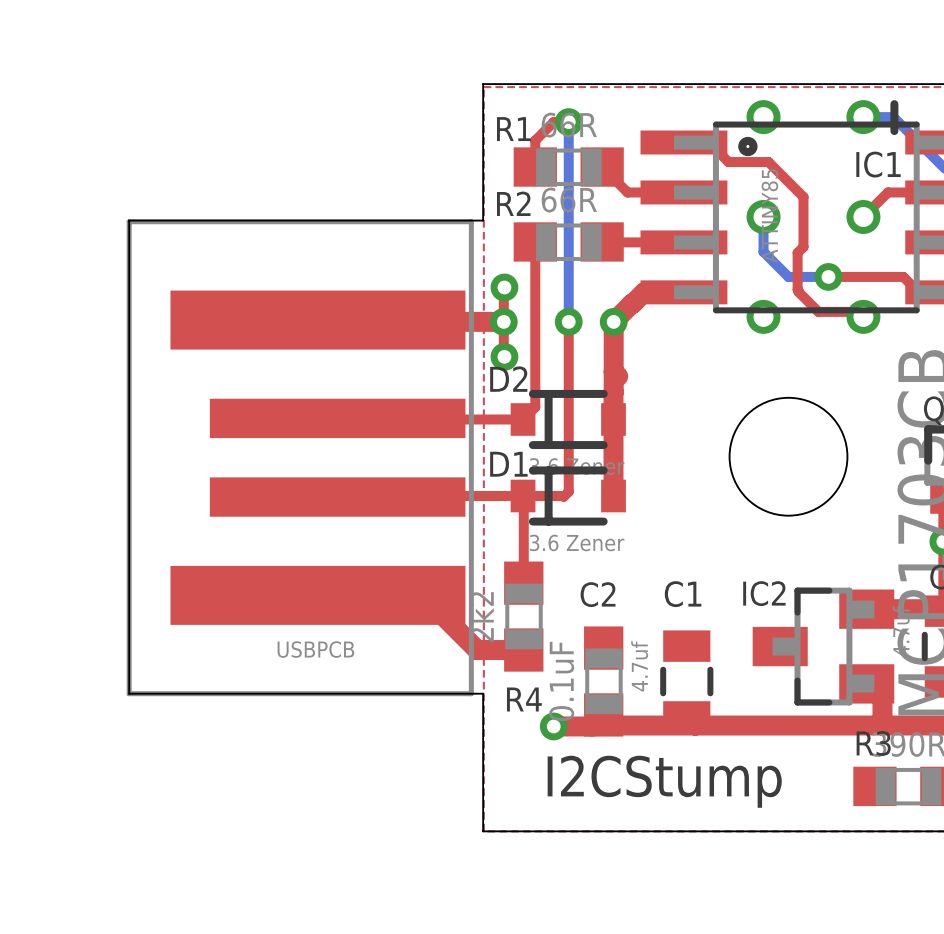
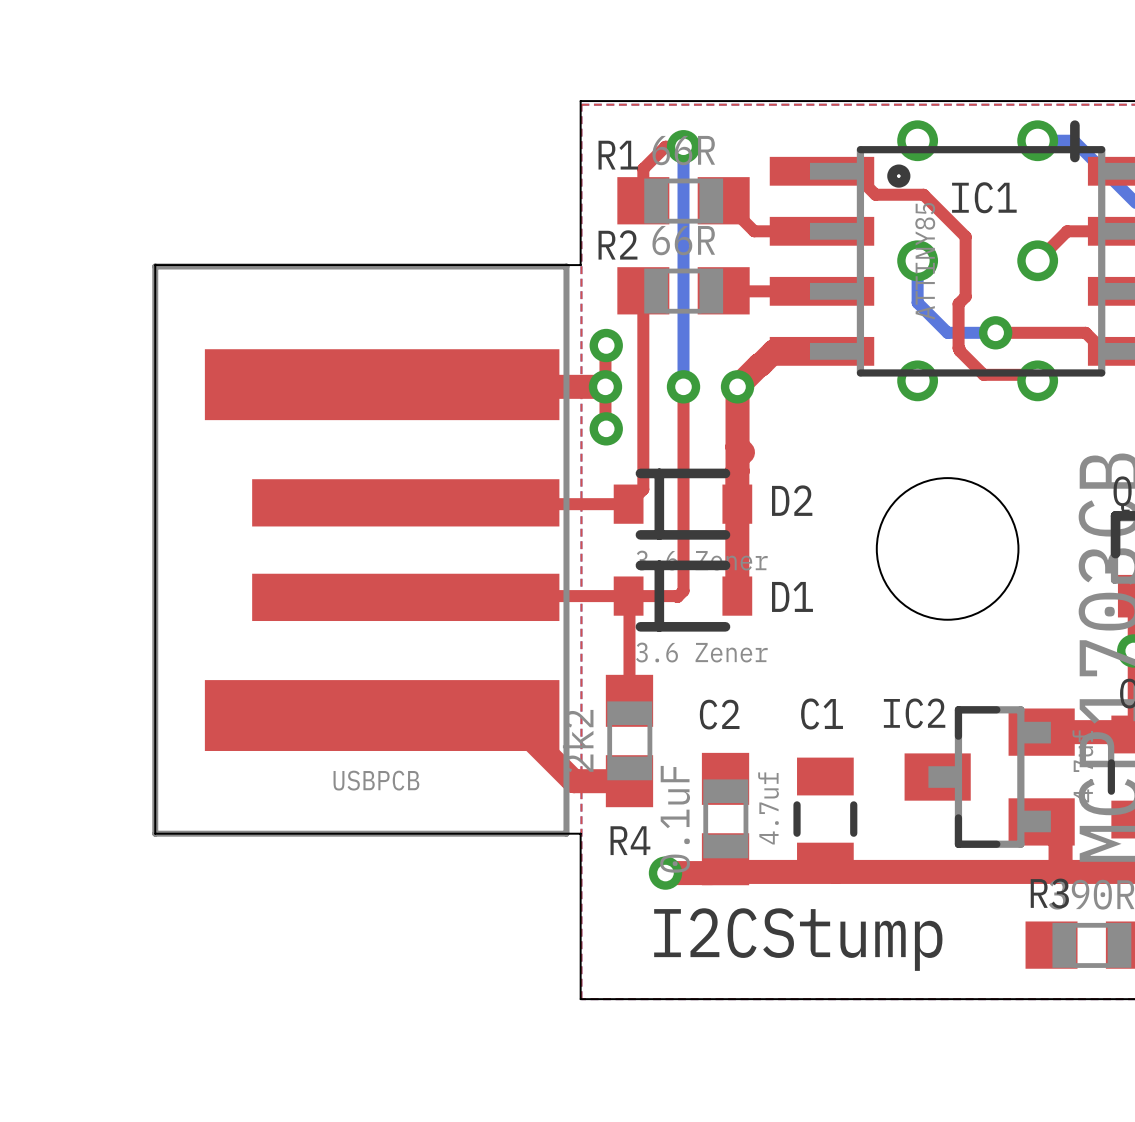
text position: IC1 (878, 164) -> IC1 (984, 197)
text position: D2 (508, 379) -> D2 (792, 500)
text position: D1 (508, 464) -> D1 (792, 596)

